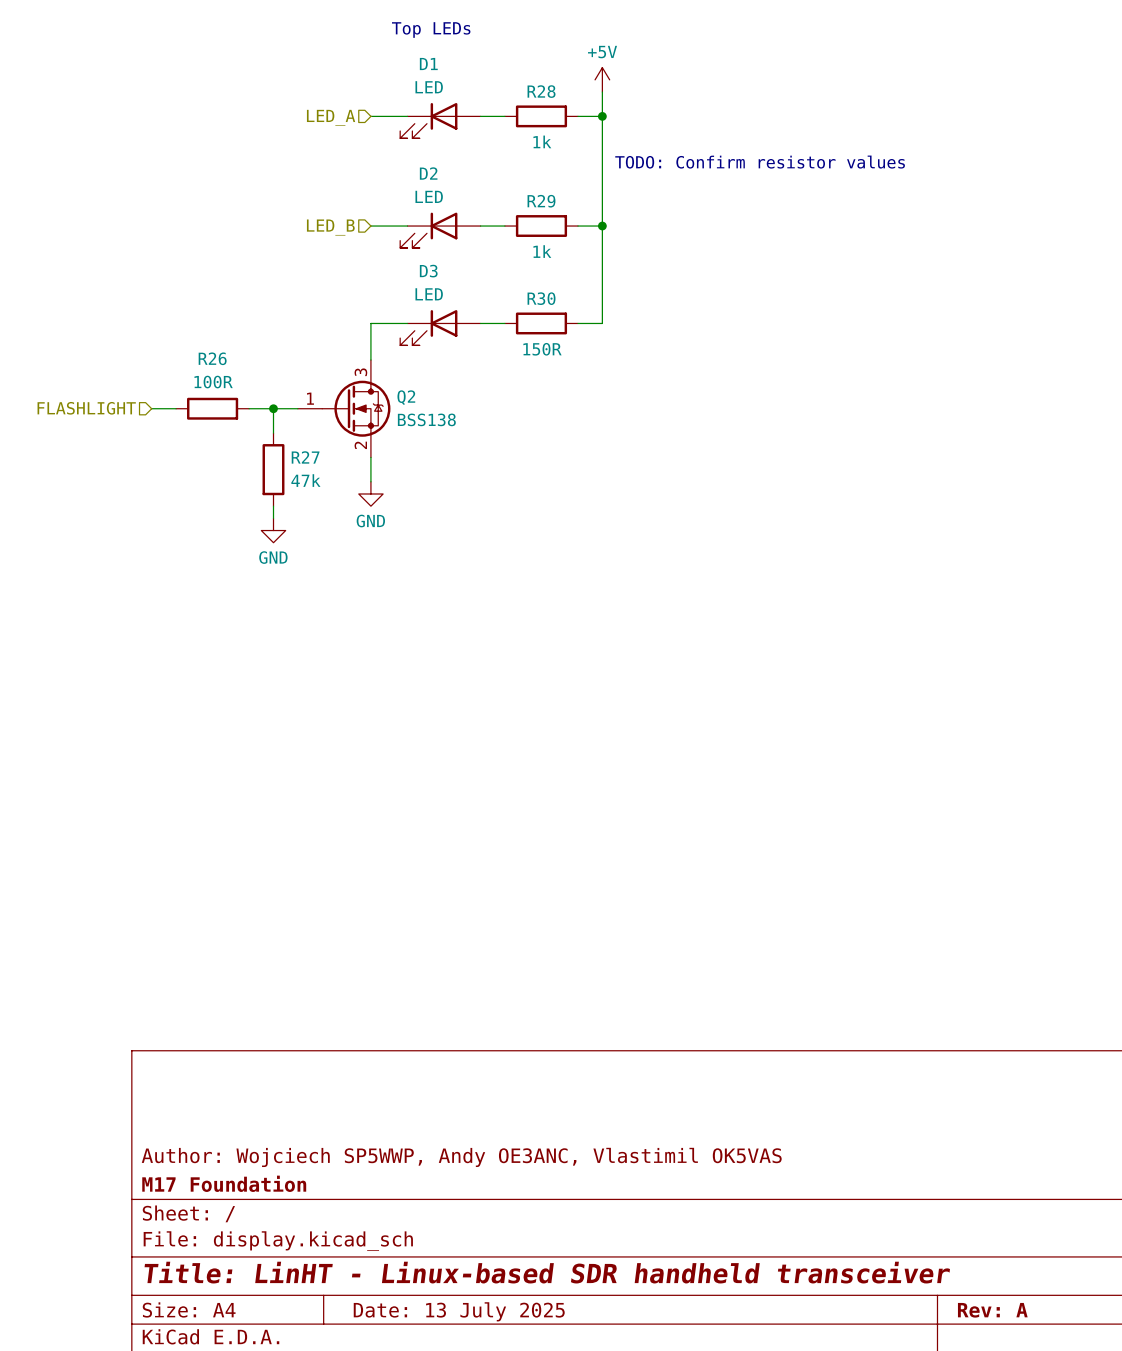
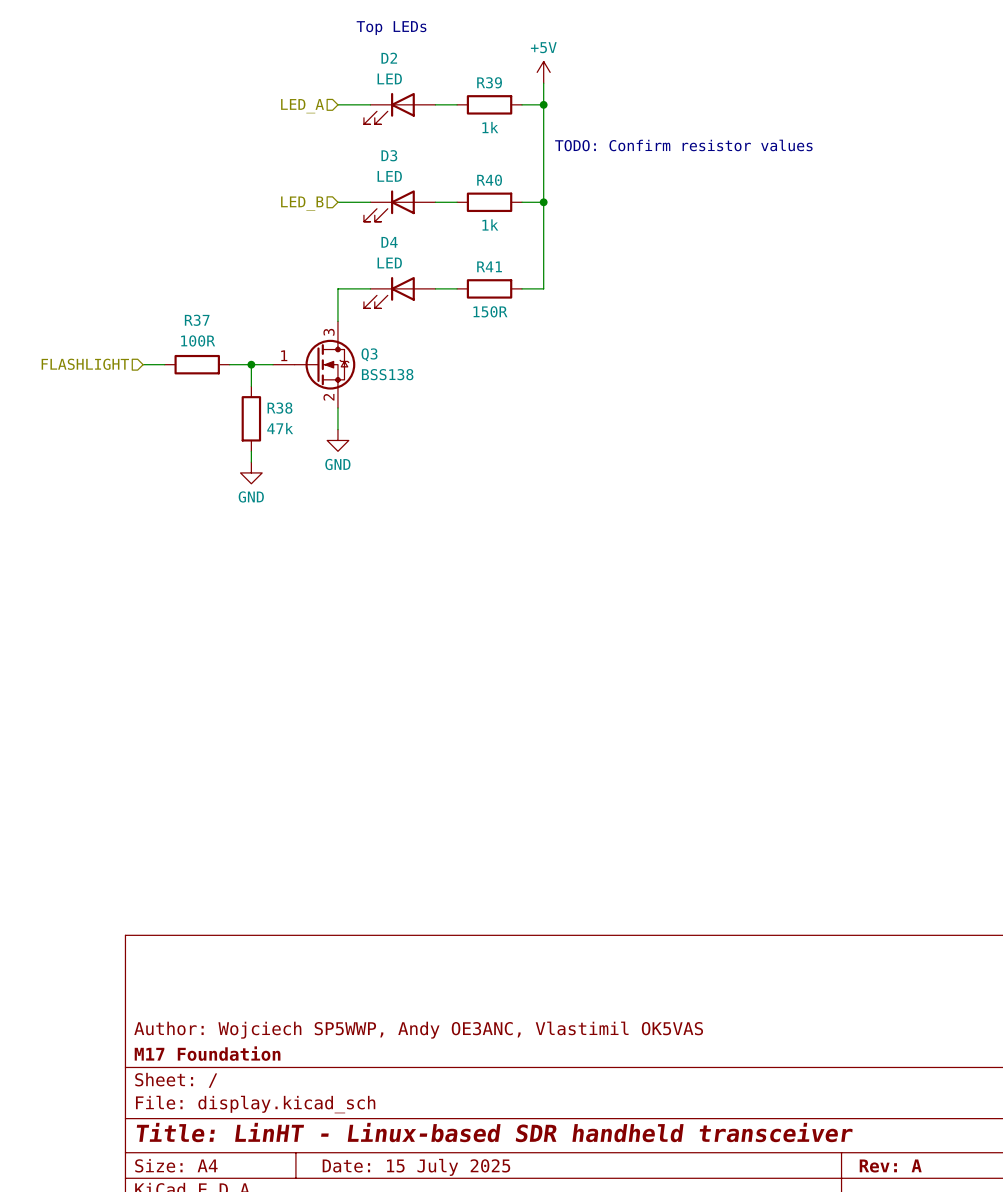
D1 name: D1 (428, 64) -> D2 (389, 58)
R28 name: R28 (541, 91) -> R39 (489, 82)
D2 name: D2 (428, 173) -> D3 (389, 155)
R29 name: R29 (541, 201) -> R40 (489, 180)
D3 name: D3 (428, 271) -> D4 (389, 242)
R30 name: R30 (541, 298) -> R41 (489, 266)
R26 name: R26 (212, 358) -> R37 (197, 320)
Q2 name: Q2 (406, 397) -> Q3 (369, 354)
R27 name: R27 (305, 457) -> R38 (279, 408)
title block: Date: 13 July 2025 (459, 1311) -> Date: 15 July 2025 (416, 1167)

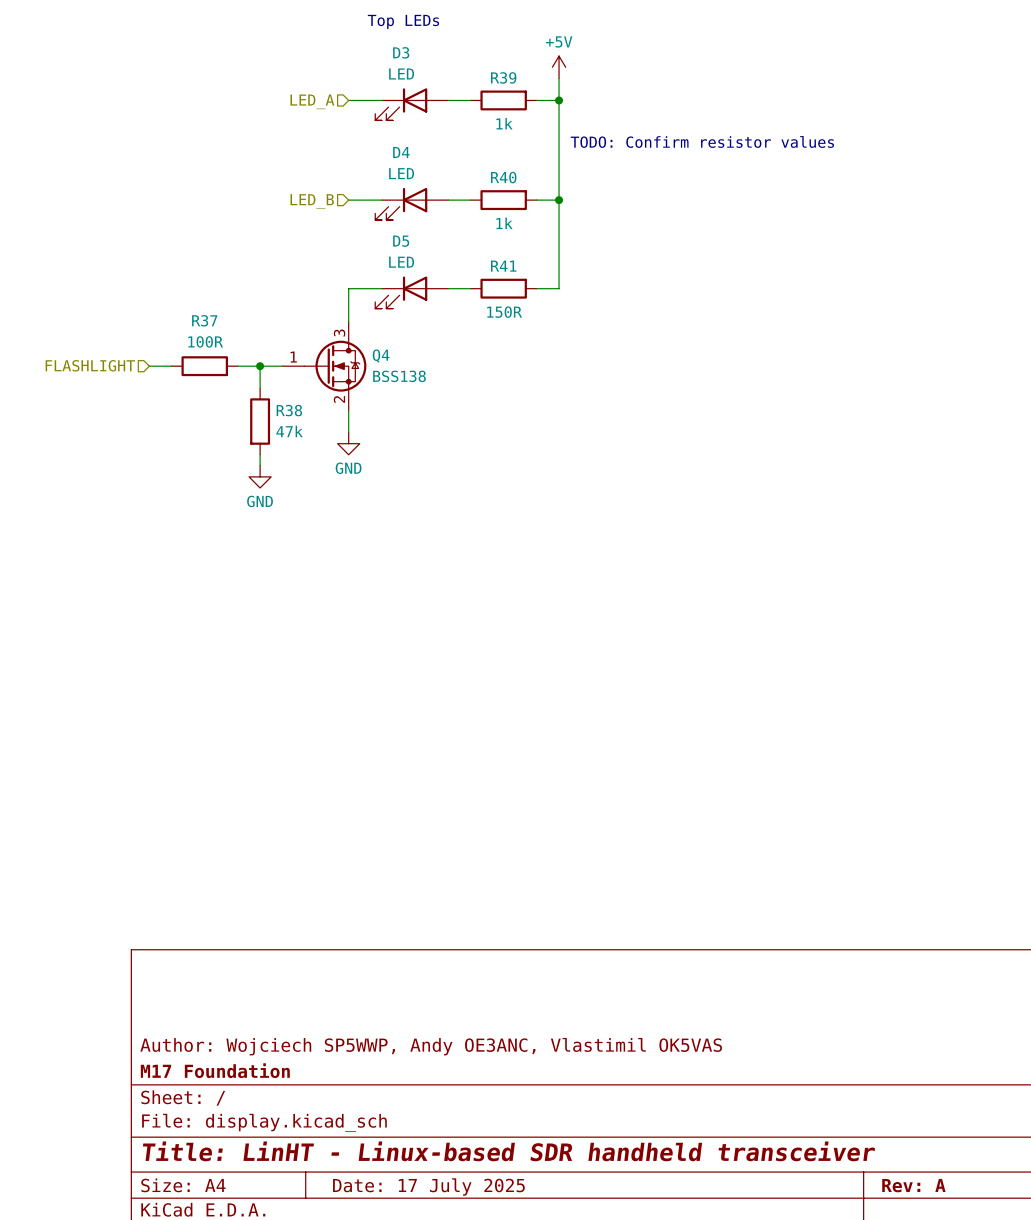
D2 name: D2 (389, 58) -> D3 (401, 52)
D3 name: D3 (389, 155) -> D4 (401, 152)
D4 name: D4 (389, 242) -> D5 (401, 241)
Q3 name: Q3 (369, 354) -> Q4 (381, 356)
title block: Date: 15 July 2025 (416, 1167) -> Date: 17 July 2025 (428, 1187)

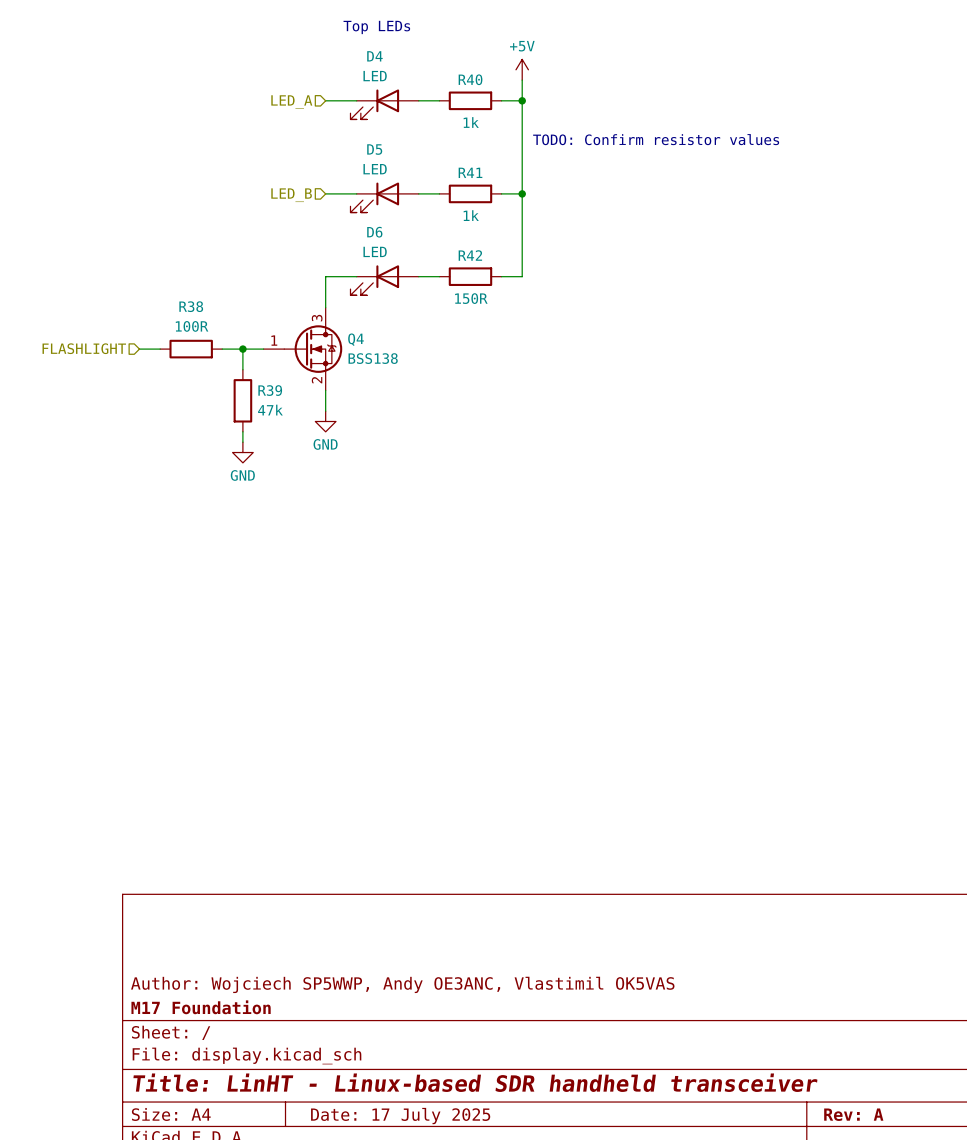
D3 name: D3 (401, 52) -> D4 (374, 56)
R39 name: R39 (503, 77) -> R40 (470, 79)
D4 name: D4 (401, 152) -> D5 (374, 149)
R40 name: R40 (503, 177) -> R41 (470, 172)
D5 name: D5 (401, 241) -> D6 (374, 232)
R41 name: R41 (503, 266) -> R42 (470, 255)
R37 name: R37 (204, 320) -> R38 (191, 306)
R38 name: R38 (289, 410) -> R39 (270, 390)

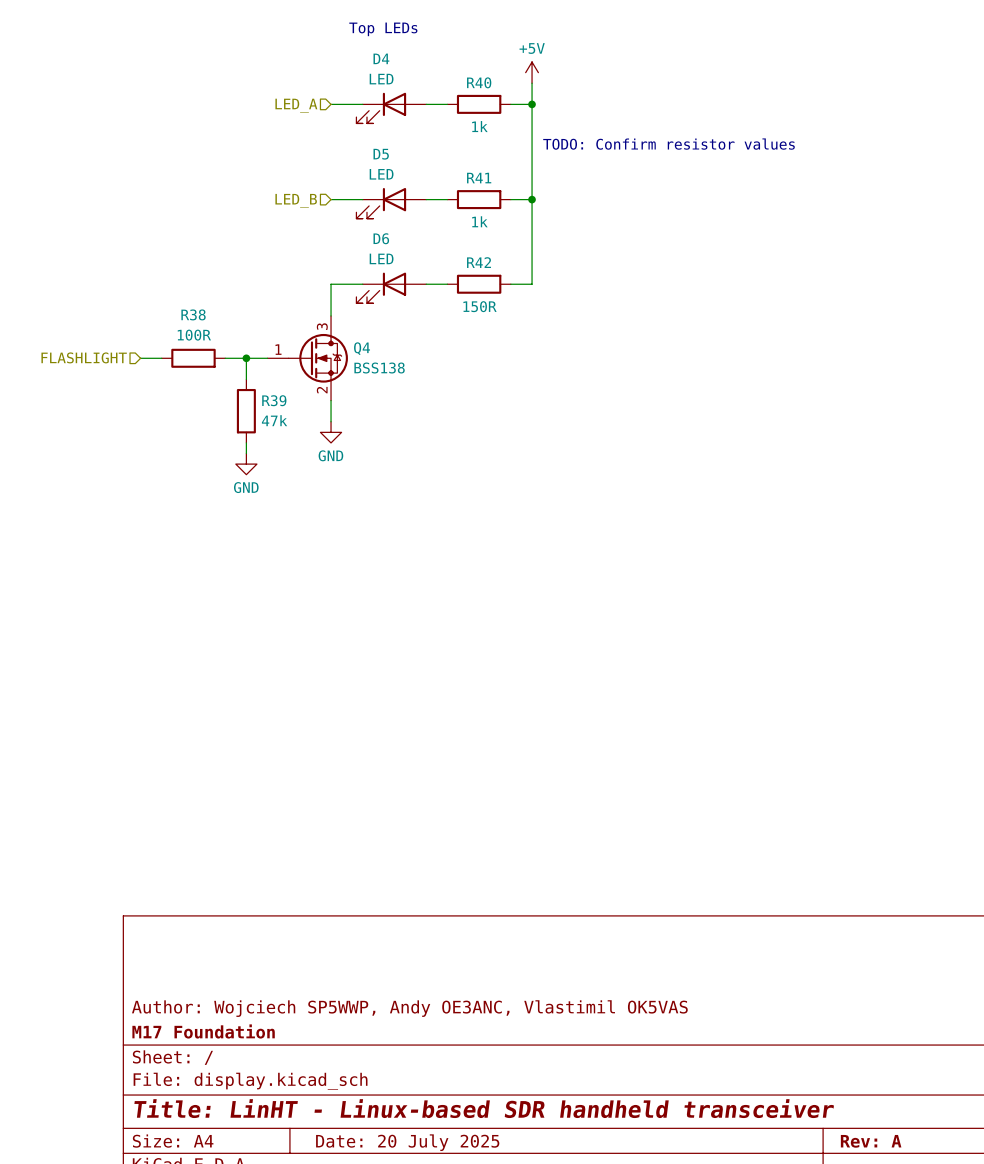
title block: Date: 17 July 2025 (400, 1116) -> Date: 20 July 2025 (407, 1142)

